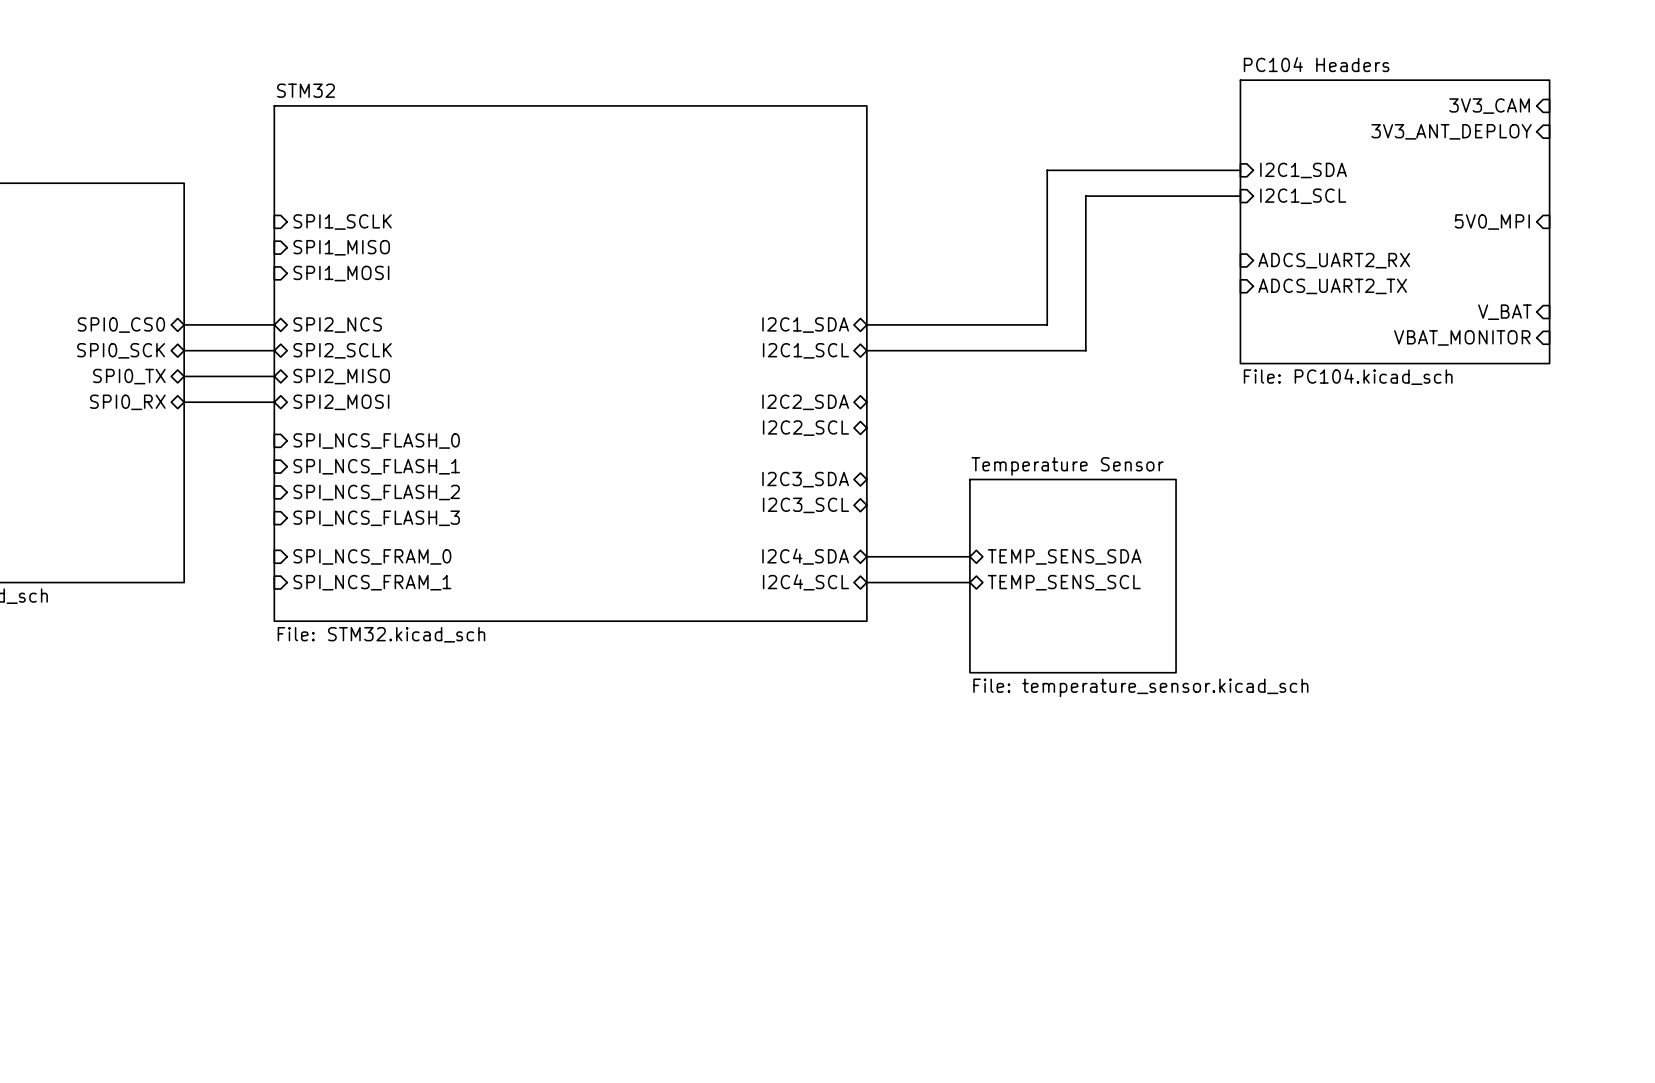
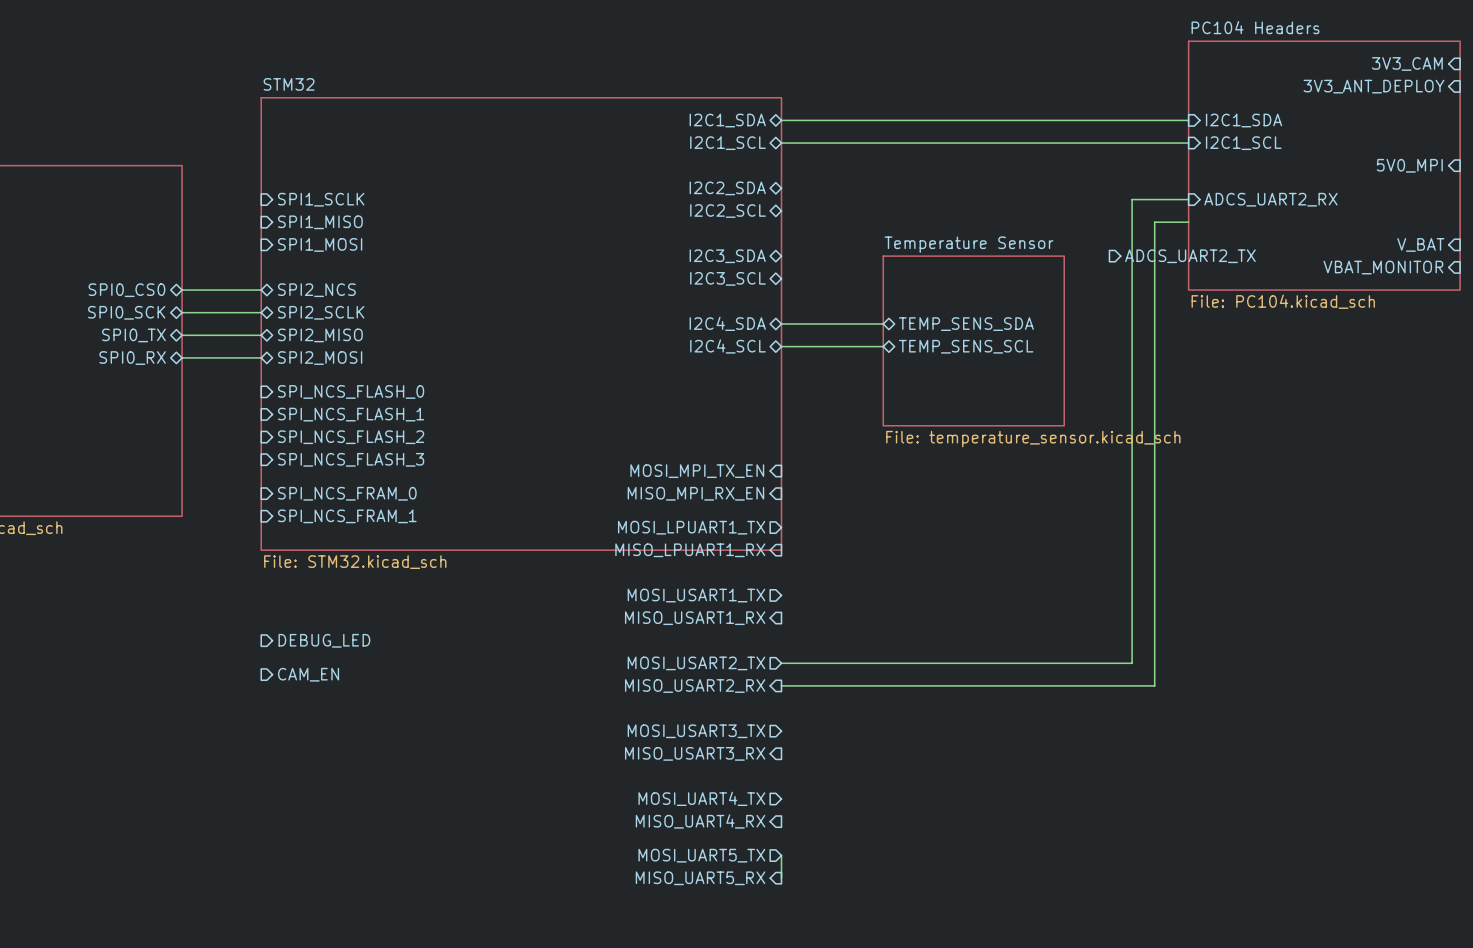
sheet pin position: 3V3_CAM (1489, 106) -> 3V3_CAM (1407, 63)
wire: none -> (781, 120) (1188, 120)
sheet pin position: 3V3_ANT_DEPLOY (1451, 131) -> 3V3_ANT_DEPLOY (1374, 86)
wire: none -> (781, 143) (1188, 143)
wire: (1240, 170) (1047, 170) (1047, 324) (866, 324) -> none
sheet pin position: I2C1_SDA (1303, 170) -> I2C1_SDA (1244, 120)
wire: (1240, 196) (1085, 196) (1085, 350) (866, 350) -> none
sheet pin position: I2C1_SCL (1303, 196) -> I2C1_SCL (1243, 143)
wire: none -> (1188, 199) (1132, 199) (1132, 663) (781, 663)
sheet PC104 Headers position: (1395, 221) -> (1324, 165)
sheet pin position: 5V0_MPI (1492, 222) -> 5V0_MPI (1409, 165)
wire: none -> (1188, 222) (1154, 222) (1154, 685) (781, 685)
sheet pin position: ADCS_UART2_RX (1334, 260) -> ADCS_UART2_RX (1270, 199)
sheet pin position: V_BAT (1504, 312) -> V_BAT (1420, 244)
sheet pin position: I2C1_SDA (805, 325) -> I2C1_SDA (727, 120)
sheet pin position: VBAT_MONITOR (1462, 337) -> VBAT_MONITOR (1383, 267)
sheet pin position: I2C1_SCL (805, 350) -> I2C1_SCL (727, 143)
sheet pin: none -> I2C4_SDA (727, 323)
wire: none -> (781, 323) (883, 323)
wire: none -> (781, 346) (883, 346)
sheet pin position: I2C2_SDA (805, 402) -> I2C2_SDA (727, 188)
sheet pin position: I2C2_SCL (805, 428) -> I2C2_SCL (727, 211)
sheet pin position: I2C3_SDA (805, 479) -> I2C3_SDA (727, 256)
sheet pin position: I2C3_SCL (805, 505) -> I2C3_SCL (727, 278)
sheet pin: none -> MOSI_MPI_TX_EN (697, 471)
sheet pin shape: bidirectional (805, 556) -> input (695, 493)
sheet pin: I2C4_SDA (805, 556) -> MISO_MPI_RX_EN (695, 493)
wire: (866, 556) (969, 556) -> none
sheet pin position: TEMP_SENS_SDA (1064, 556) -> TEMP_SENS_SDA (966, 324)
sheet Temperature Sensor position: (1072, 576) -> (973, 340)
sheet pin position: I2C4_SCL (805, 582) -> I2C4_SCL (727, 346)
wire: (866, 582) (969, 582) -> none
sheet pin position: TEMP_SENS_SCL (1064, 582) -> TEMP_SENS_SCL (966, 346)
sheet pin: none -> MOSI_LPUART1_TX (691, 527)
sheet pin: none -> MISO_LPUART1_RX (690, 550)
sheet pin: none -> MOSI_USART1_TX (696, 595)
sheet pin: none -> MISO_USART1_RX (695, 618)
sheet pin: none -> DEBUG_LED (324, 640)
sheet pin: none -> MOSI_USART2_TX (696, 663)
sheet pin: none -> CAM_EN (308, 674)
sheet pin: none -> MISO_USART2_RX (695, 686)
sheet pin: none -> MOSI_USART3_TX (696, 731)
sheet pin: none -> MISO_USART3_RX (695, 753)
sheet pin: none -> MOSI_UART4_TX (701, 798)
sheet pin: none -> MISO_UART4_RX (700, 821)
sheet pin: none -> MOSI_UART5_TX (701, 855)
wire: none -> (781, 855) (781, 878)
sheet pin: none -> MISO_UART5_RX (700, 878)

